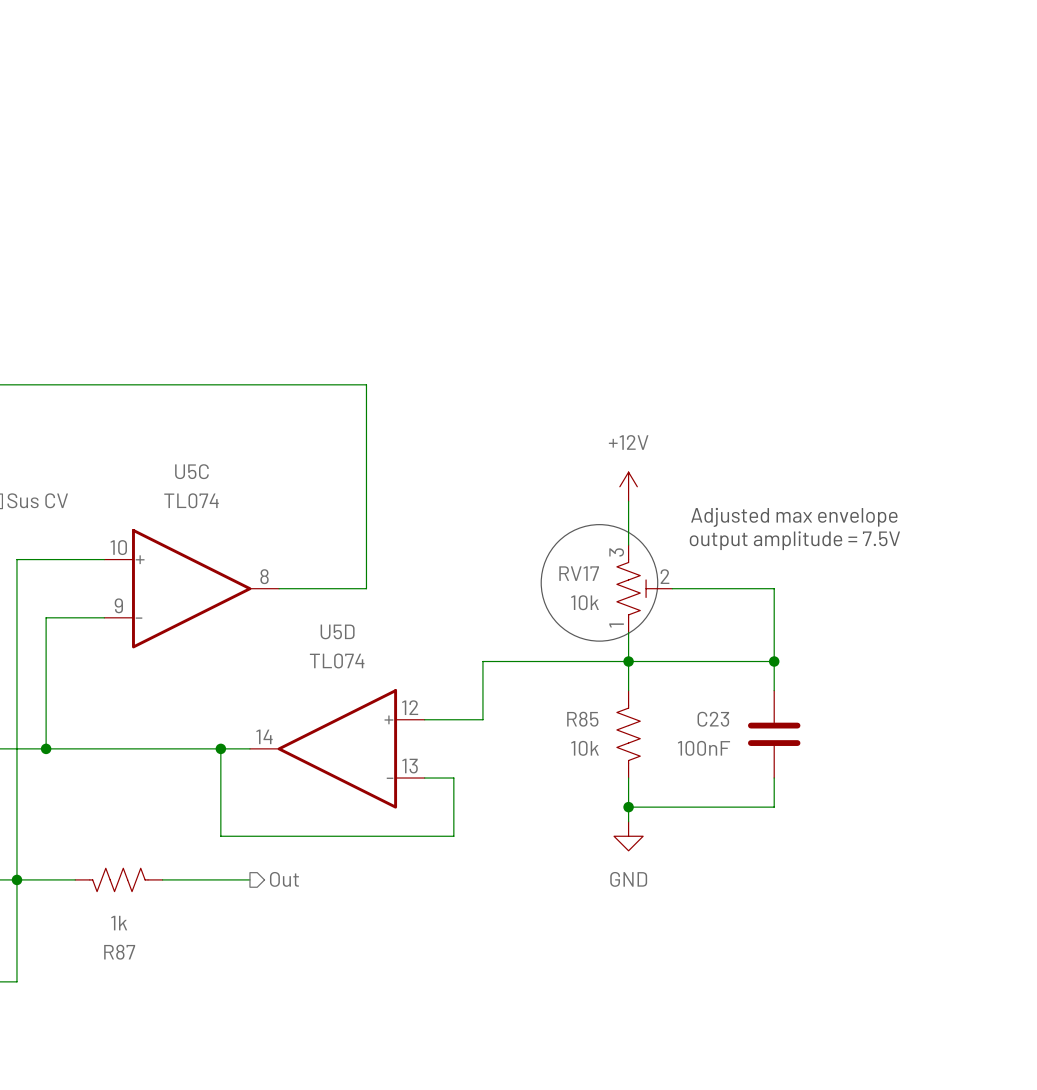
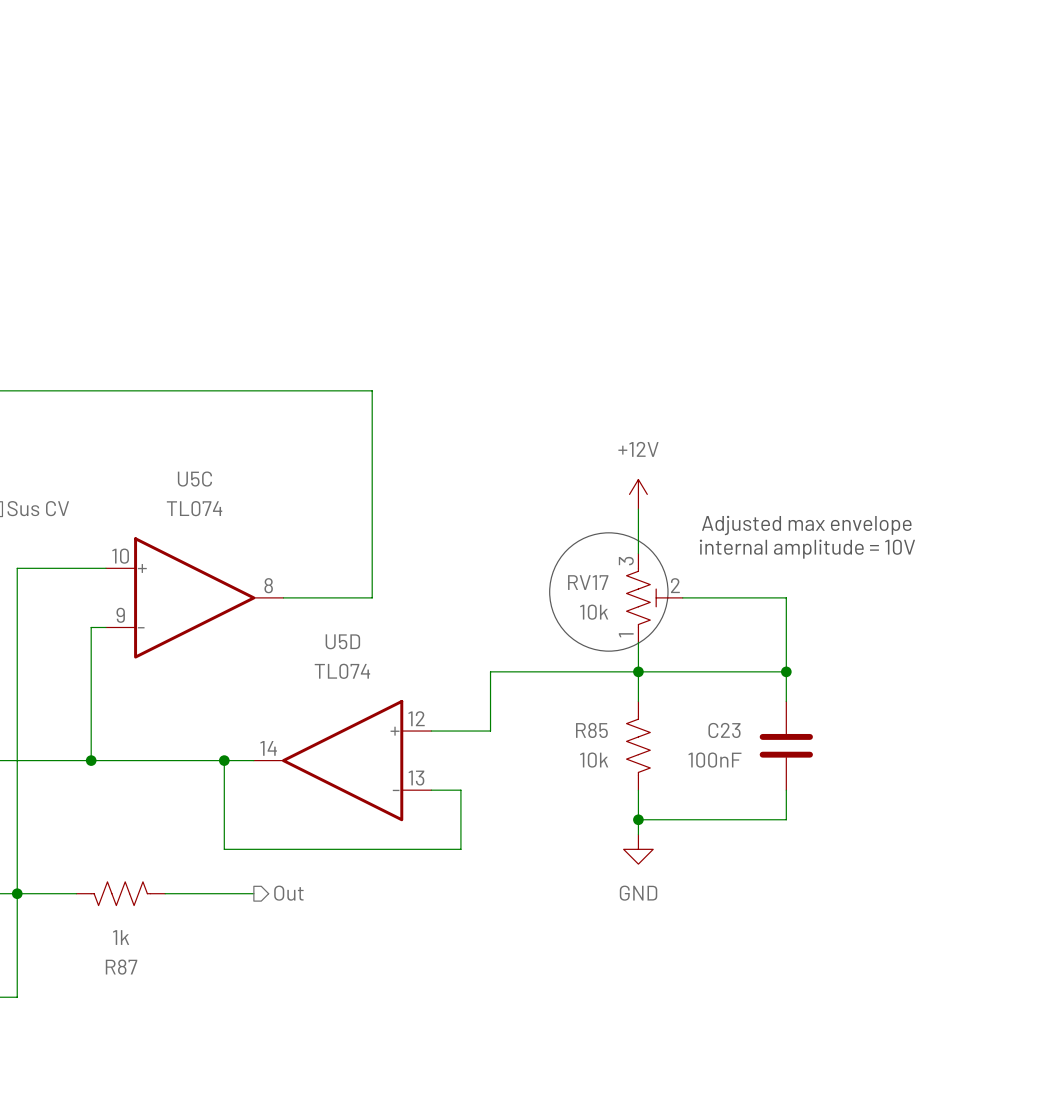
text: output amplitude = 7.5V (794, 540) -> internal amplitude = 10V (807, 549)
wire: (89, 617) (46, 617) (46, 748) -> (91, 627) (91, 760)
junction position: (46, 748) -> (91, 760)

